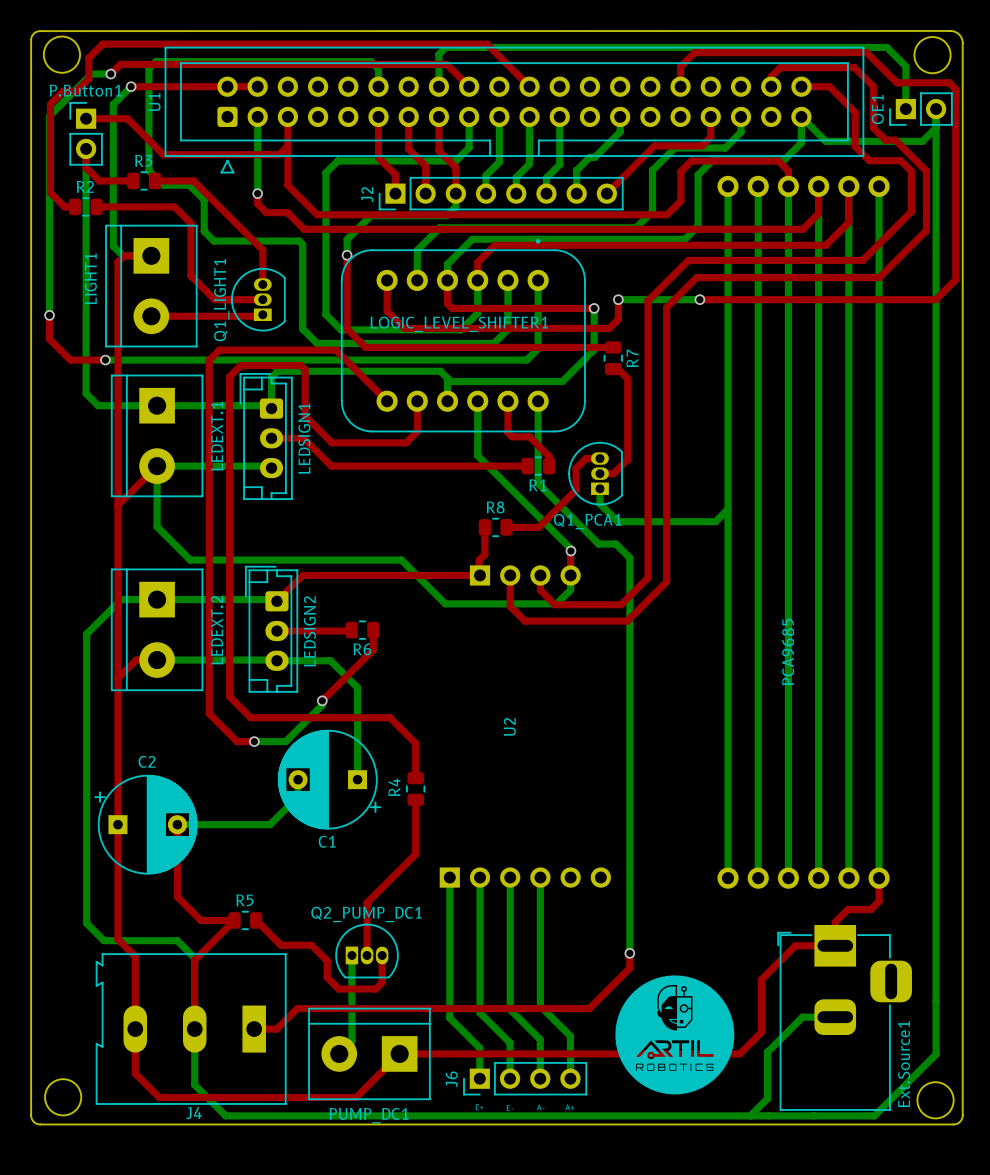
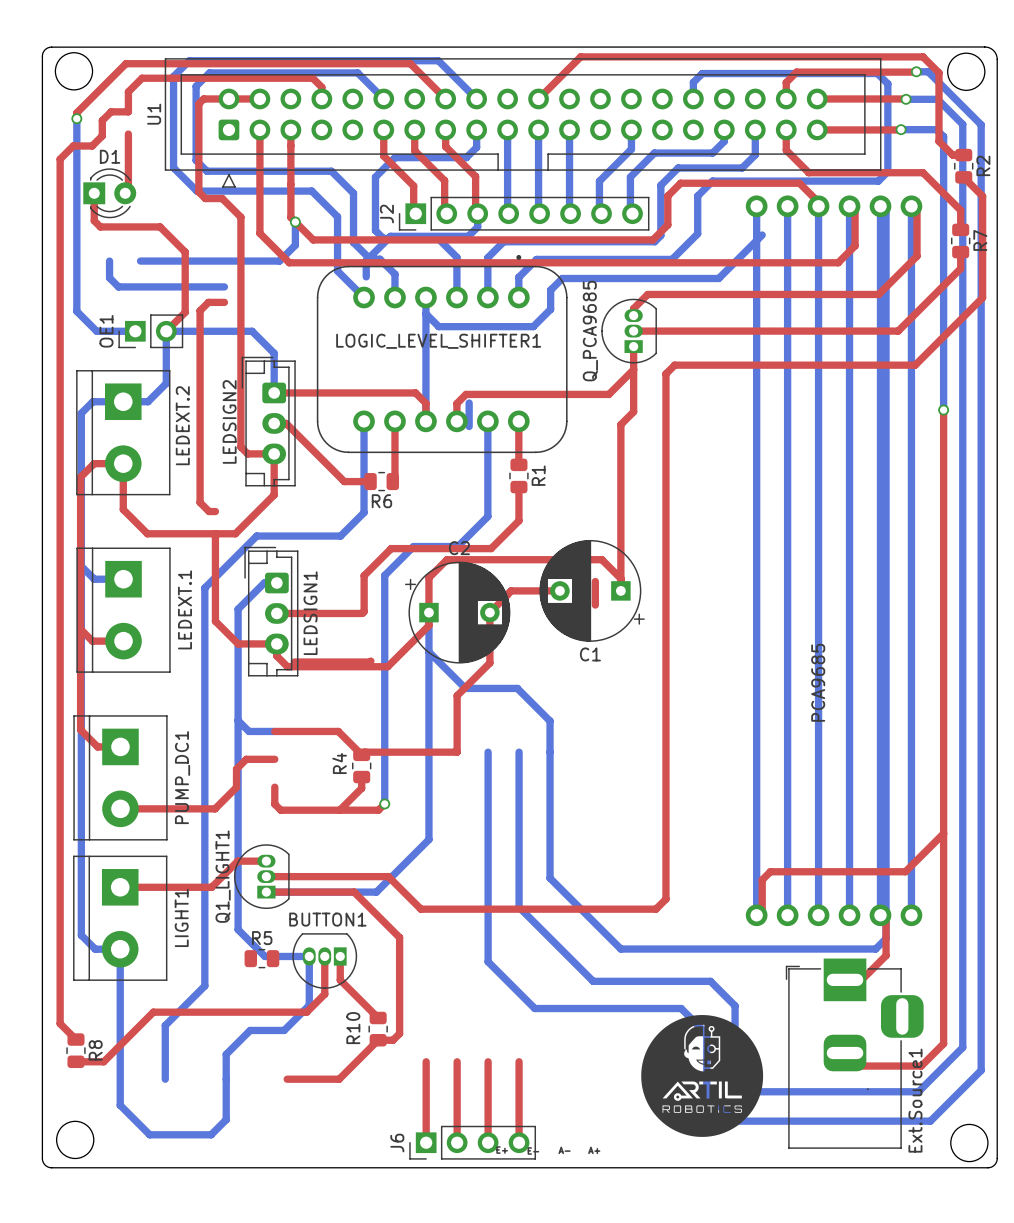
top track: none -> (916, 71) (796, 72) (786, 82) (786, 98)
bottom track: none -> (916, 71) (928, 71) (981, 124) (981, 1070) (930, 1121) (734, 1121) (706, 1093) (706, 1034) (681, 1008) (534, 1008) (488, 961) (488, 752)
via: none -> (916, 71)
top track: (110, 74) (120, 64) (446, 64) (469, 86) -> none
bottom track: (110, 74) (91, 74) (49, 116) (49, 315) -> none
via: (110, 74) -> none
top track: none -> (259, 98) (203, 98) (198, 103) (198, 192) (205, 198) (222, 198) (240, 217) (240, 447) (247, 453) (274, 453) (274, 494) (235, 533) (147, 533) (123, 509) (123, 463) (94, 463) (80, 477) (80, 729) (97, 746) (120, 746)
top track: none -> (321, 98) (321, 87) (312, 78) (142, 78) (128, 91) (128, 111) (111, 111) (102, 120) (102, 135) (92, 146) (73, 146) (60, 159) (60, 1023) (75, 1039)
bottom track: none -> (383, 98) (357, 72) (209, 72) (196, 86) (196, 160) (206, 171) (331, 171) (353, 193) (353, 242) (370, 259) (379, 259) (394, 274) (394, 297)
top track: none -> (445, 98) (410, 63) (125, 63) (76, 112) (76, 118)
bottom track: none -> (476, 98) (438, 60) (189, 60) (173, 76) (173, 167) (196, 191) (311, 191) (337, 216) (337, 271) (364, 297)
top track: none -> (538, 98) (580, 56) (923, 56) (938, 72) (938, 141) (952, 155) (963, 155)
bottom track: none -> (693, 98) (693, 82) (702, 73) (877, 73) (887, 83) (887, 171) (878, 181) (712, 181) (697, 196) (697, 233) (672, 259) (536, 259) (518, 277) (518, 297)
top track: none -> (817, 98) (906, 99)
bottom track: none -> (906, 99) (937, 99) (962, 124) (962, 1047) (918, 1091) (746, 1091) (735, 1080) (735, 1005) (710, 981) (593, 981) (519, 907) (519, 752)
via: none -> (906, 99)
top track: (131, 86) (257, 86) -> none
bottom track: (131, 86) (113, 104) (113, 246) (122, 255) (151, 255) -> none
via: (131, 86) -> none
bottom track: (378, 86) (378, 69) (370, 61) (155, 61) (148, 68) (148, 170) (163, 185) (189, 185) (204, 199) (204, 231) (213, 241) (299, 241) (302, 244) (302, 328) (317, 343) (493, 343) (507, 329) (507, 280) -> none
bottom track: (438, 86) (438, 54) (445, 47) (886, 47) (905, 66) (905, 109) -> none
top track: (529, 86) (486, 44) (102, 44) (88, 58) (88, 78) (76, 91) (63, 91) (50, 104) (50, 192) (64, 206) (74, 206) -> none
top track: (680, 86) (680, 66) (694, 52) (866, 52) (896, 82) (949, 82) (955, 89) (955, 279) (935, 299) (699, 299) -> none
top track: (771, 86) (771, 76) (780, 67) (854, 67) (873, 86) (873, 127) (885, 140) (895, 140) (926, 171) (926, 230) (879, 277) (696, 277) (666, 307) (666, 581) (627, 621) (525, 621) (510, 606) (510, 575) -> none
top track: (801, 86) (829, 86) (855, 112) (855, 146) (869, 160) (900, 160) (911, 171) (911, 211) (862, 260) (688, 260) (647, 300) (647, 577) (621, 604) (554, 604) (540, 590) (540, 575) -> none
bottom track: none -> (76, 118) (76, 311) (96, 331) (135, 331)
via: none -> (76, 118)
OE1 position: (920, 109) -> (150, 331)
bottom track: (936, 109) (936, 1054) (874, 1115) (225, 1115) (194, 1084) (194, 958) (177, 940) (103, 940) (86, 923) (86, 634) (121, 599) (275, 599) (276, 601) -> none
U1 position: (514, 110) -> (523, 122)
top track: none -> (259, 129) (259, 233) (289, 262) (838, 262) (855, 245) (855, 207)
top track: none -> (290, 129) (290, 217) (313, 239) (652, 239) (667, 224) (667, 196) (680, 183) (799, 183) (824, 207)
top track: none -> (383, 129) (383, 156) (413, 185) (413, 208)
top track: none -> (414, 129) (414, 150) (444, 180) (444, 208)
top track: none -> (445, 129) (445, 146) (475, 176) (475, 208)
bottom track: none -> (476, 129) (476, 147) (466, 157) (394, 157) (375, 177) (375, 230) (383, 238) (438, 238) (456, 257) (456, 297)
bottom track: none -> (507, 129) (506, 208)
bottom track: none -> (538, 129) (537, 208)
bottom track: none -> (569, 129) (568, 208)
bottom track: none -> (631, 129) (631, 149) (599, 181) (599, 208)
bottom track: none -> (724, 129) (724, 141) (712, 153) (654, 153) (630, 177) (630, 208)
bottom track: none -> (755, 129) (755, 154) (742, 168) (678, 168) (660, 185) (660, 235) (654, 241) (503, 241) (487, 257) (487, 297)
top track: none -> (786, 129) (786, 150) (808, 172) (923, 172) (960, 210) (960, 229)
top track: none -> (901, 129) (817, 129)
bottom track: none -> (901, 129) (936, 129) (943, 136) (943, 410)
via: none -> (901, 129)
top track: none -> (128, 134) (128, 190) (125, 193)
bottom track: (257, 116) (257, 192) -> none
top track: (287, 116) (287, 185) (317, 214) (666, 214) (680, 200) (680, 171) (691, 161) (778, 161) (788, 170) (788, 186) -> none
top track: (378, 116) (378, 157) (395, 174) (395, 193) -> none
top track: (408, 116) (408, 149) (425, 166) (425, 193) -> none
top track: (438, 116) (438, 150) (455, 167) (455, 193) -> none
bottom track: (469, 116) (469, 147) (455, 161) (337, 161) (325, 172) (325, 314) (341, 329) (460, 329) (477, 313) (477, 280) -> none
bottom track: (499, 116) (499, 162) (486, 175) (486, 193) -> none
bottom track: (529, 116) (529, 164) (516, 177) (516, 193) -> none
bottom track: (559, 116) (559, 164) (546, 177) (546, 193) -> none
bottom track: (620, 116) (620, 132) (594, 157) (589, 157) (576, 170) (576, 193) -> none
top track: (710, 116) (710, 137) (702, 145) (654, 145) (606, 193) -> none
bottom track: (741, 116) (741, 132) (725, 148) (674, 148) (652, 170) (652, 211) (636, 227) (439, 227) (417, 250) (417, 280) -> none
top track: (86, 118) (127, 118) (163, 154) (279, 154) (287, 145) -> none
bottom track: (936, 127) (922, 141) (825, 141) (801, 116) (801, 142) (783, 160) (712, 160) (698, 174) (698, 226) (685, 239) (472, 239) (447, 264) (447, 280) -> none
P.Button1: (86, 133) -> none
top track: (86, 148) (86, 167) (99, 180) (133, 180) -> none
bottom track: (86, 148) (86, 393) (98, 405) (268, 405) (271, 408) (271, 377) (277, 371) (440, 371) (450, 381) (562, 381) (594, 349) (594, 308) -> none
top track: none -> (963, 177) (982, 196) (982, 297) (915, 365) (674, 365) (665, 373) (665, 899) (655, 909) (420, 909) (388, 876) (266, 876)
top track: none -> (94, 193) (94, 220) (100, 226) (160, 226) (185, 252) (185, 312) (166, 331)
D1: none -> (109, 193)
R3: (144, 180) -> none
top track: (154, 180) (193, 180) (262, 250) (262, 284) -> none
top track: (818, 186) (818, 213) (802, 229) (304, 229) (287, 212) (266, 212) (257, 203) (257, 193) -> none
top track: (848, 186) (848, 222) (825, 245) (494, 245) (477, 262) (477, 280) -> none
bottom track: none -> (886, 207) (886, 938) (875, 949) (620, 949) (550, 878) (550, 721) (517, 688) (465, 688) (428, 651)
top track: none -> (917, 207) (917, 256) (878, 294) (647, 294) (633, 308) (633, 315)
via position: (257, 193) -> (295, 222)
bottom track: none -> (295, 222) (295, 245) (279, 261) (140, 261)
R2 rotation: 0° (85, 206) -> 90° clockwise (963, 166)
R2 position: (85, 206) -> (963, 166)
top track: (96, 206) (174, 206) (190, 223) (190, 275) (214, 299) (262, 299) -> none
bottom track: none -> (762, 235) (718, 278) (562, 278) (550, 290) (550, 309) (533, 326) (438, 326) (425, 313)
top track: none -> (960, 252) (960, 268) (898, 331) (633, 331)
bottom track: none -> (109, 261) (109, 277) (118, 286) (224, 286)
top track: (151, 255) (124, 255) (117, 262) (117, 939) (135, 956) (135, 1073) (159, 1097) (356, 1097) (399, 1053) (739, 1053) (761, 1032) (761, 979) (795, 945) (835, 945) (835, 922) (847, 909) (870, 909) (879, 901) (879, 878) -> none
top track: (347, 255) (347, 328) (365, 347) (613, 347) -> none
via: (347, 255) -> none
bottom track: none -> (425, 297) (425, 421)
LIGHT1 name position: LIGHT1 (90, 278) -> LIGHT1 (181, 917)
top track: none -> (224, 302) (208, 302) (200, 310) (200, 502) (209, 511) (215, 511)
top track: (387, 280) (387, 310) (404, 328) (609, 328) (618, 319) (618, 299) -> none
top track: (447, 280) (447, 303) (452, 308) (594, 308) -> none
bottom track: (538, 280) (538, 348) (526, 360) (105, 360) -> none
LIGHT1 position: (151, 286) -> (120, 918)
Q1_LIGHT1 position: (258, 299) -> (261, 876)
bottom track: (618, 299) (699, 299) -> none
via: (618, 299) -> none
via: (699, 299) -> none
via: (594, 308) -> none
Q_PCA9685: none -> (629, 331)
top track: (262, 314) (151, 316) -> none
top track: (49, 315) (49, 339) (70, 360) (105, 360) -> none
via: (49, 315) -> none
top track: none -> (633, 346) (633, 411) (620, 424) (620, 590)
LOGIC_LEVEL_SHIFTER1 position: (463, 335) -> (442, 354)
top track: none -> (633, 369) (608, 394) (466, 394) (456, 403) (456, 421)
R7 position: (613, 358) -> (960, 240)
via: (105, 360) -> none
top track: none -> (274, 392) (415, 392) (425, 403) (425, 421)
bottom track: none -> (274, 392) (274, 353) (252, 331) (166, 331) (166, 383) (148, 401) (92, 401) (81, 413) (81, 935) (95, 949) (120, 949) (120, 1105) (149, 1134) (211, 1134) (226, 1119) (226, 1054) (250, 1030) (284, 1030) (309, 1005) (309, 956) (264, 956) (238, 929) (238, 609) (264, 582) (276, 582)
top track: (613, 369) (618, 369) (627, 378) (627, 459) (613, 473) (599, 473) -> none
top track: none -> (943, 410) (943, 1043) (921, 1066) (858, 1066) (845, 1053)
via: none -> (943, 410)
bottom track: none -> (364, 421) (364, 512) (340, 536) (256, 536) (204, 587) (204, 985) (165, 1025) (165, 1079)
top track: none -> (394, 421) (394, 479) (392, 481)
bottom track: none -> (487, 421) (487, 516) (457, 546) (413, 546) (384, 575) (384, 803)
top track: none -> (518, 421) (518, 464)
top track: none -> (274, 423) (286, 423) (344, 481) (370, 481)
top track: (387, 401) (335, 350) (219, 350) (209, 360) (209, 713) (237, 741) (254, 741) -> none
top track: (417, 401) (417, 431) (406, 442) (331, 442) (305, 415) (305, 369) (300, 365) (240, 365) (229, 376) (229, 696) (250, 717) (389, 717) (415, 743) (415, 778) -> none
bottom track: (477, 401) (477, 455) (570, 550) -> none
top track: (507, 401) (507, 432) (512, 436) (529, 436) (549, 456) (549, 466) -> none
bottom track: (538, 401) (538, 483) (598, 544) (615, 544) (629, 557) (629, 953) -> none
LEDEXT.1 position: (157, 435) -> (123, 610)
LEDSIGN1 position: (266, 436) -> (271, 611)
top track: (271, 438) (303, 438) (331, 466) (527, 466) -> none
top track: (599, 458) (586, 458) (576, 468) (576, 489) (538, 527) (506, 527) -> none
top track: none -> (518, 487) (518, 520) (491, 548) (391, 548) (364, 575) (364, 611) (362, 613) (276, 613)
top track: (157, 466) (117, 505) -> none
R1 rotation: 0° (538, 466) -> 90° clockwise (518, 475)
R1 position: (538, 466) -> (518, 475)
bottom track: (271, 468) (269, 466) (157, 466) (157, 526) (190, 560) (401, 560) (445, 603) (556, 603) (570, 589) (570, 575) -> none
Q1_PCA1: (595, 473) -> none
R1 name position: R1 (537, 485) -> R1 (538, 475)
bottom track: (599, 488) (599, 503) (617, 521) (715, 521) (728, 509) -> none
top track: none -> (215, 533) (215, 621) (238, 643) (276, 643) (276, 656) (287, 666) (387, 666) (428, 625) (428, 577) (447, 559) (601, 559) (620, 578)
top track: (484, 527) (484, 554) (479, 560) (480, 575) (302, 575) (276, 601) -> none
R8 rotation: 0° (495, 527) -> 90° clockwise (75, 1050)
R8 position: (495, 527) -> (75, 1050)
bottom track: none -> (81, 566) (94, 579) (123, 579)
via: (570, 550) -> none
top track: none -> (559, 590) (511, 590) (489, 612) (489, 662) (457, 695) (457, 752) (364, 752) (361, 754) (338, 731) (274, 731)
bottom track: none -> (428, 612) (428, 839) (376, 892) (266, 892)
top track: none -> (80, 629) (92, 641) (123, 641)
LEDEXT.2 position: (157, 629) -> (123, 432)
LEDSIGN2 position: (271, 629) -> (268, 421)
LEDEXT.2 name position: LEDEXT.2 (217, 630) -> LEDEXT.2 (182, 425)
R6 position: (362, 630) -> (381, 481)
top track: (373, 630) (373, 649) (322, 700) -> none
LEDSIGN2 name position: LEDSIGN2 (309, 631) -> LEDSIGN2 (229, 421)
top track: (157, 660) (136, 660) (117, 678) -> none
bottom track: (157, 660) (330, 660) (357, 687) (357, 779) -> none
bottom track: none -> (238, 720) (248, 731) (274, 731)
bottom track: (322, 700) (322, 705) (285, 741) (254, 741) -> none
via: (322, 700) -> none
top track: none -> (274, 759) (246, 759) (236, 769) (236, 787) (215, 808) (120, 808)
U2: (525, 726) -> none
via: (254, 741) -> none
top track: none -> (361, 777) (361, 788) (339, 810)
top track: none -> (274, 787) (274, 804) (280, 810) (378, 810) (384, 803)
via: none -> (384, 803)
bottom track: (298, 779) (298, 796) (270, 824) (177, 824) -> none
C1 position: (329, 779) -> (592, 590)
R4 position: (415, 789) -> (361, 765)
top track: none -> (943, 833) (905, 871) (770, 871) (762, 879) (762, 916)
top track: (415, 799) (415, 854) (367, 902) (367, 955) -> none
C2 position: (145, 824) -> (457, 612)
top track: (177, 824) (177, 896) (200, 920) (234, 920) (194, 960) (194, 1029) -> none
top track: none -> (266, 861) (237, 861) (211, 887) (120, 887)
top track: none -> (266, 892) (354, 892) (399, 937) (399, 1033) (393, 1040) (378, 1040) (339, 1079) (287, 1079)
bottom track: (449, 877) (449, 1018) (479, 1048) (479, 1078) -> none
bottom track: (480, 877) (480, 1012) (510, 1042) (510, 1078) -> none
bottom track: (510, 877) (510, 1009) (540, 1039) (540, 1078) -> none
bottom track: (540, 877) (540, 1006) (570, 1036) (570, 1078) -> none
top track: none -> (886, 916) (886, 955) (861, 979) (845, 979)
top track: none -> (324, 956) (324, 994) (306, 1012) (153, 1012) (103, 1061) (75, 1061)
top track: none -> (340, 956) (340, 980) (378, 1017)
top track: (256, 920) (280, 945) (311, 945) (327, 960) (327, 977) (338, 989) (375, 989) (382, 982) (382, 955) -> none
BUTTON1: none -> (324, 961)
Q2_PUMP_DC1: (367, 951) -> none
top track: (629, 953) (629, 968) (589, 1008) (297, 1008) (276, 1029) (254, 1029) -> none
via: (629, 953) -> none
bottom track: (351, 955) (351, 1041) (339, 1053) -> none
R10: none -> (378, 1029)
bottom track: (835, 1017) (802, 1017) (767, 1052) (767, 1098) (750, 1115) -> none
Ext.Source1 position: (844, 1017) -> (854, 1053)
top track: none -> (426, 1061) (426, 1142)
top track: none -> (457, 1061) (457, 1142)
top track: none -> (488, 1061) (488, 1142)
top track: none -> (519, 1061) (519, 1142)
J4: (191, 1029) -> none
PUMP_DC1 rotation: 0° (369, 1053) -> 90° counterclockwise (120, 777)
PUMP_DC1 position: (369, 1053) -> (120, 777)
J6 position: (525, 1078) -> (472, 1142)

